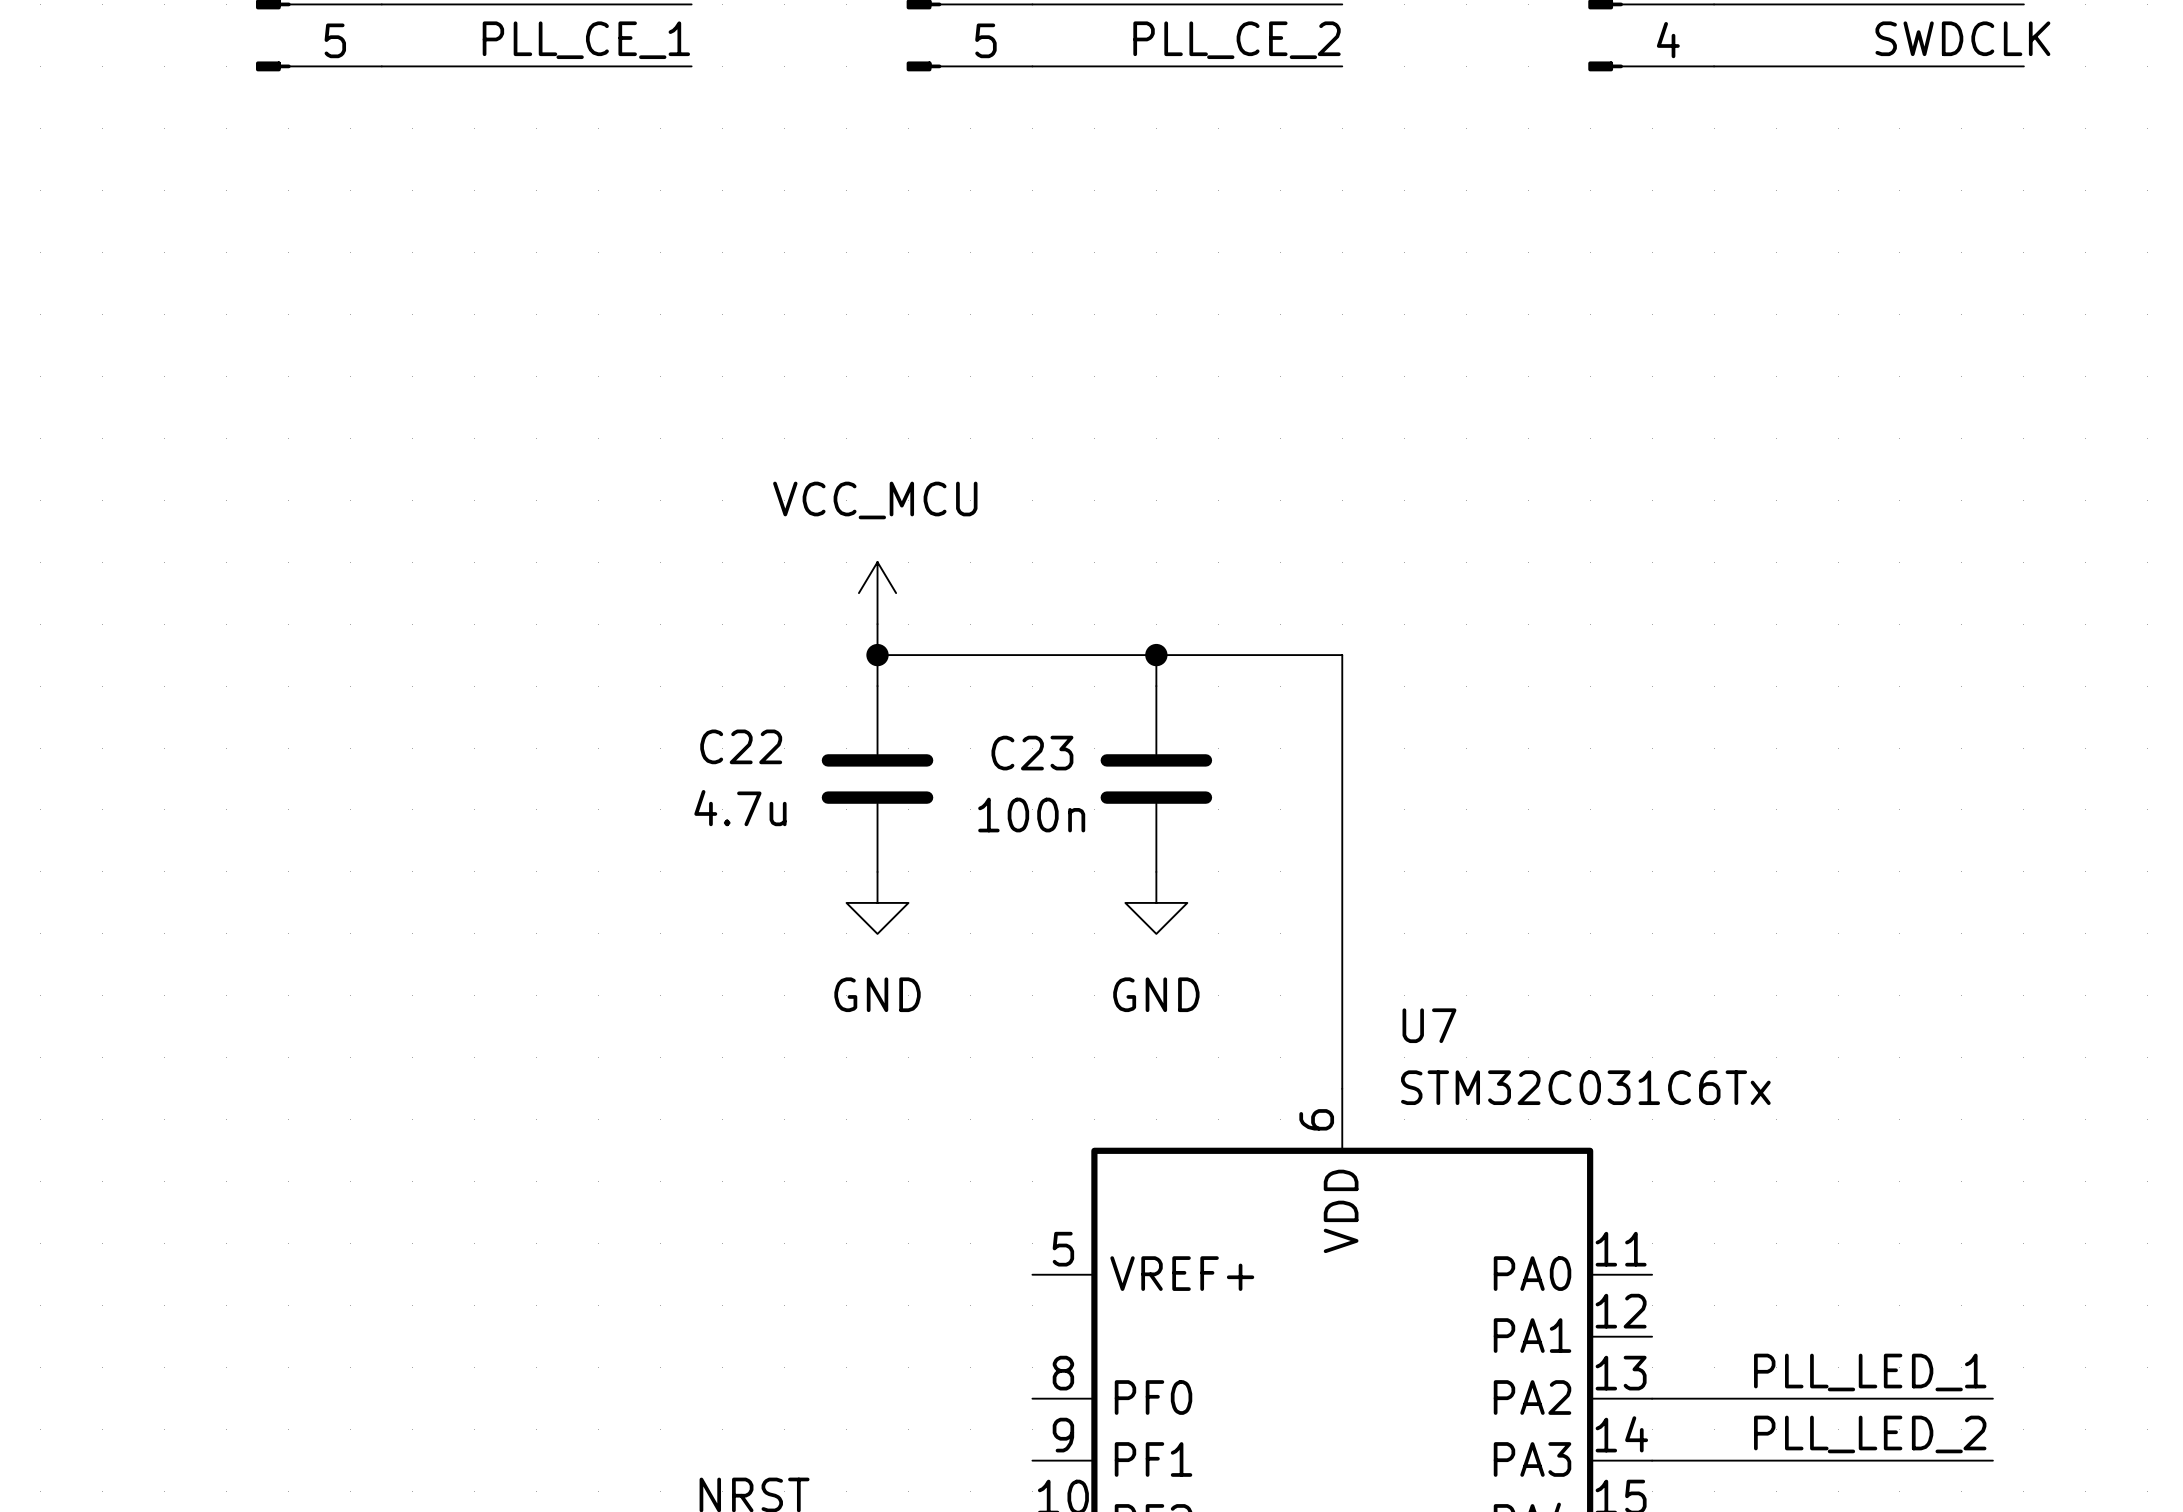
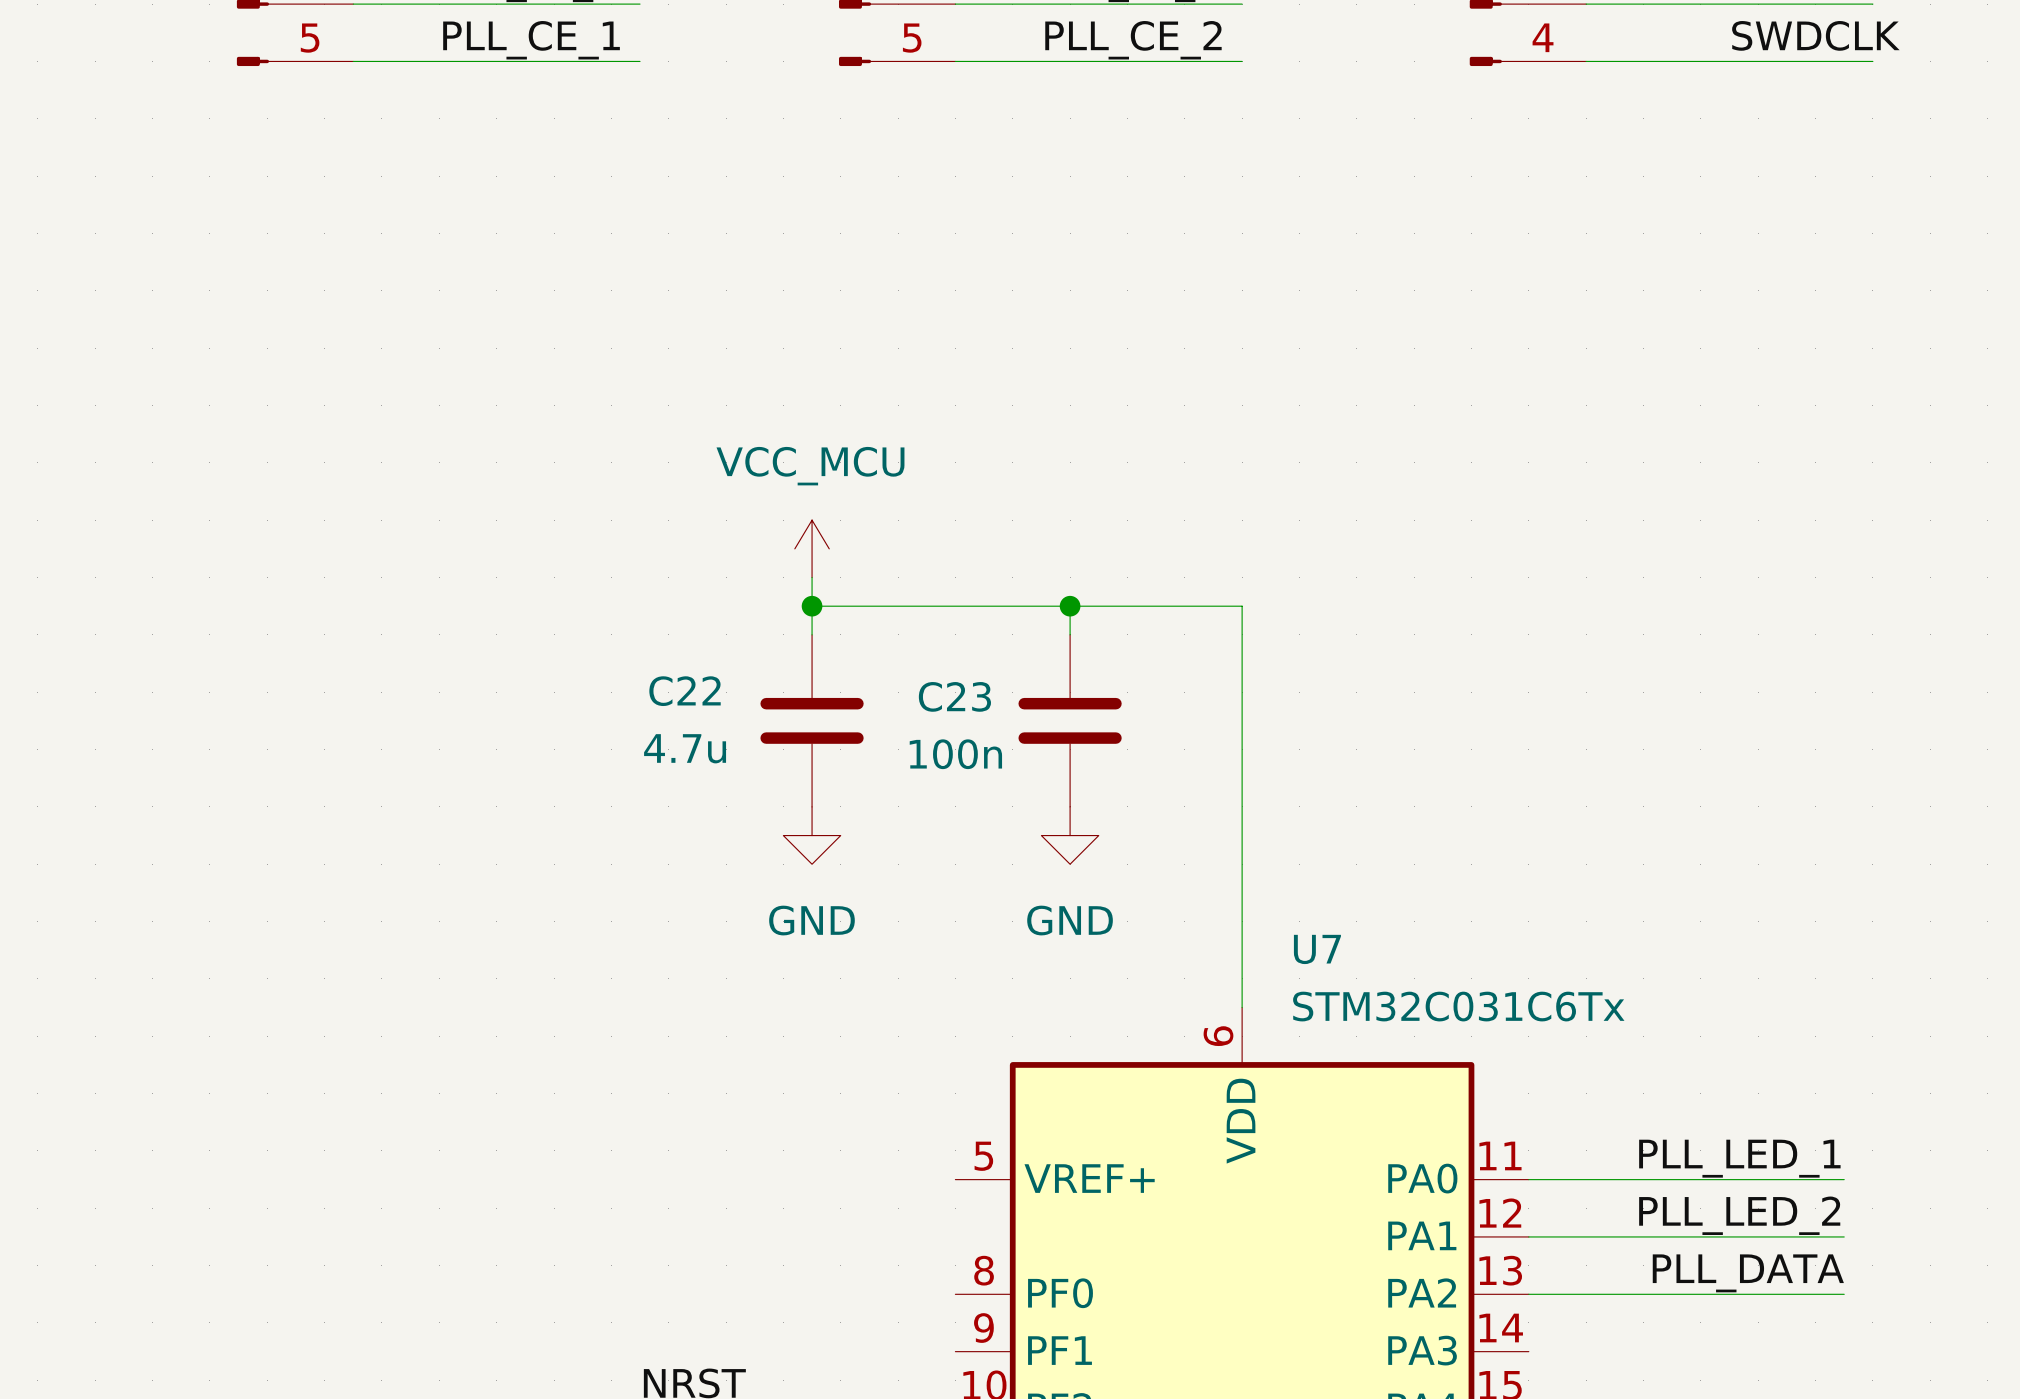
label: none -> PLL_LED_1 (1739, 1158)
wire: none -> (1528, 1179) (1844, 1179)
label: PLL_LED_1 (1870, 1372) -> PLL_DATA (1748, 1273)
label position: PLL_LED_2 (1870, 1434) -> PLL_LED_2 (1739, 1215)
wire: (1652, 1460) (1992, 1460) -> (1528, 1236) (1844, 1236)

